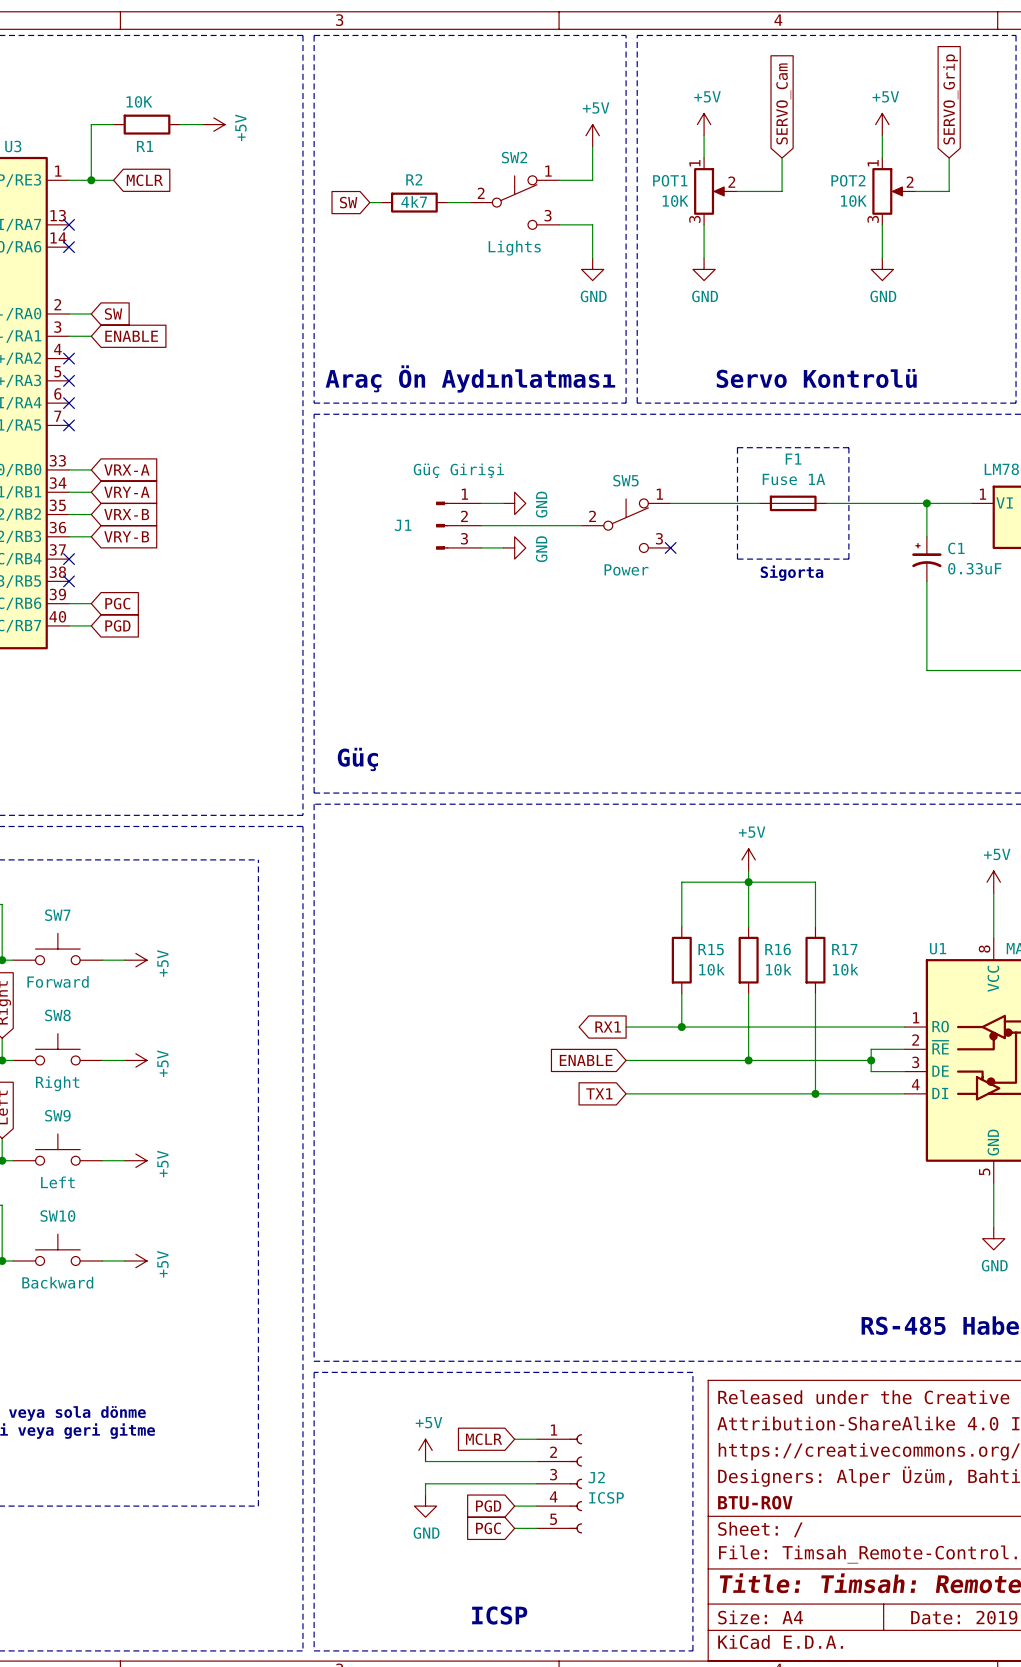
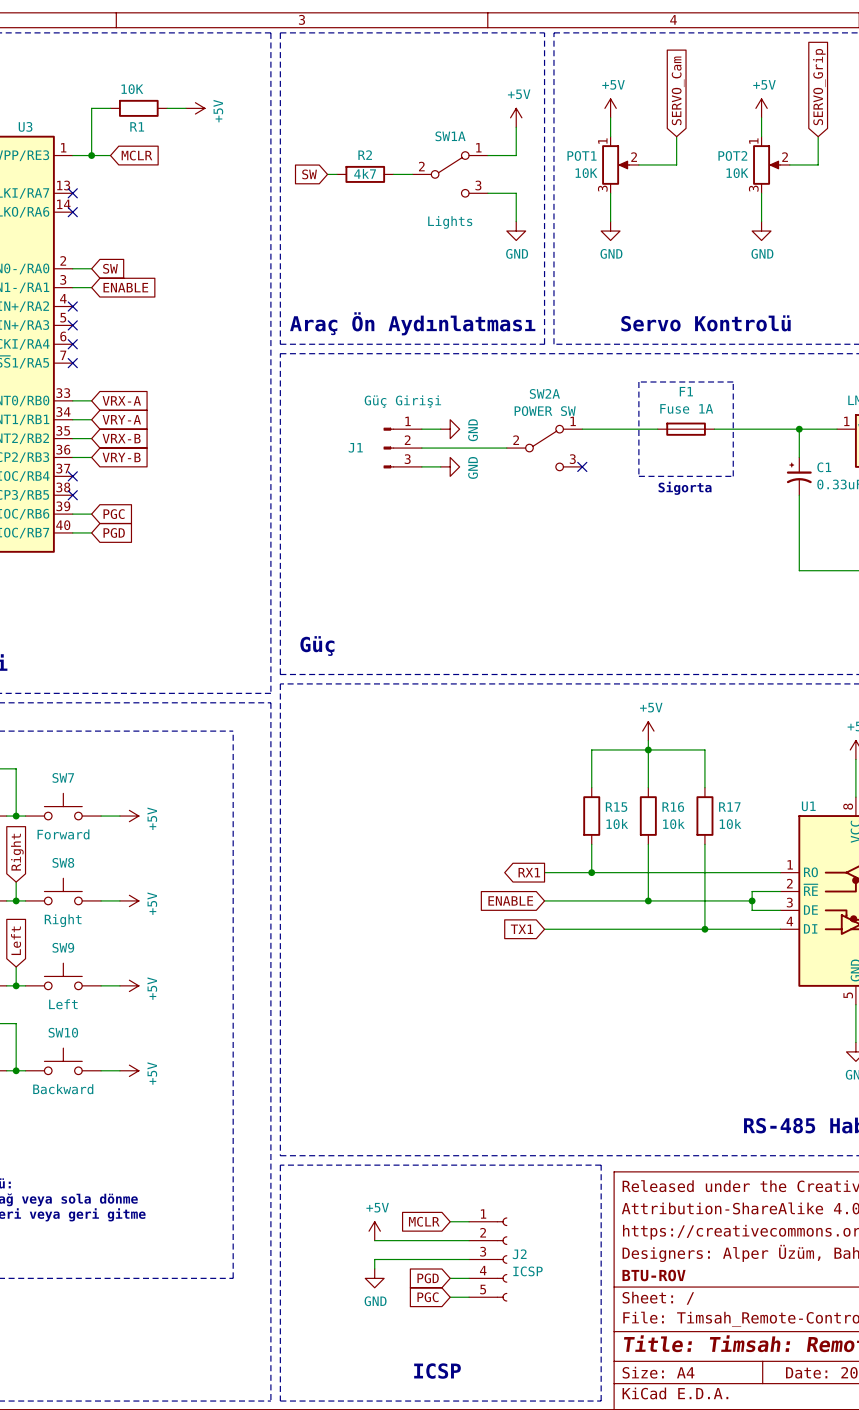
SW2: Lights (514, 202) -> none
SW1A: none -> Lights (450, 174)
SW5: Power (626, 525) -> none
SW2A: none -> POWER SW (544, 448)

